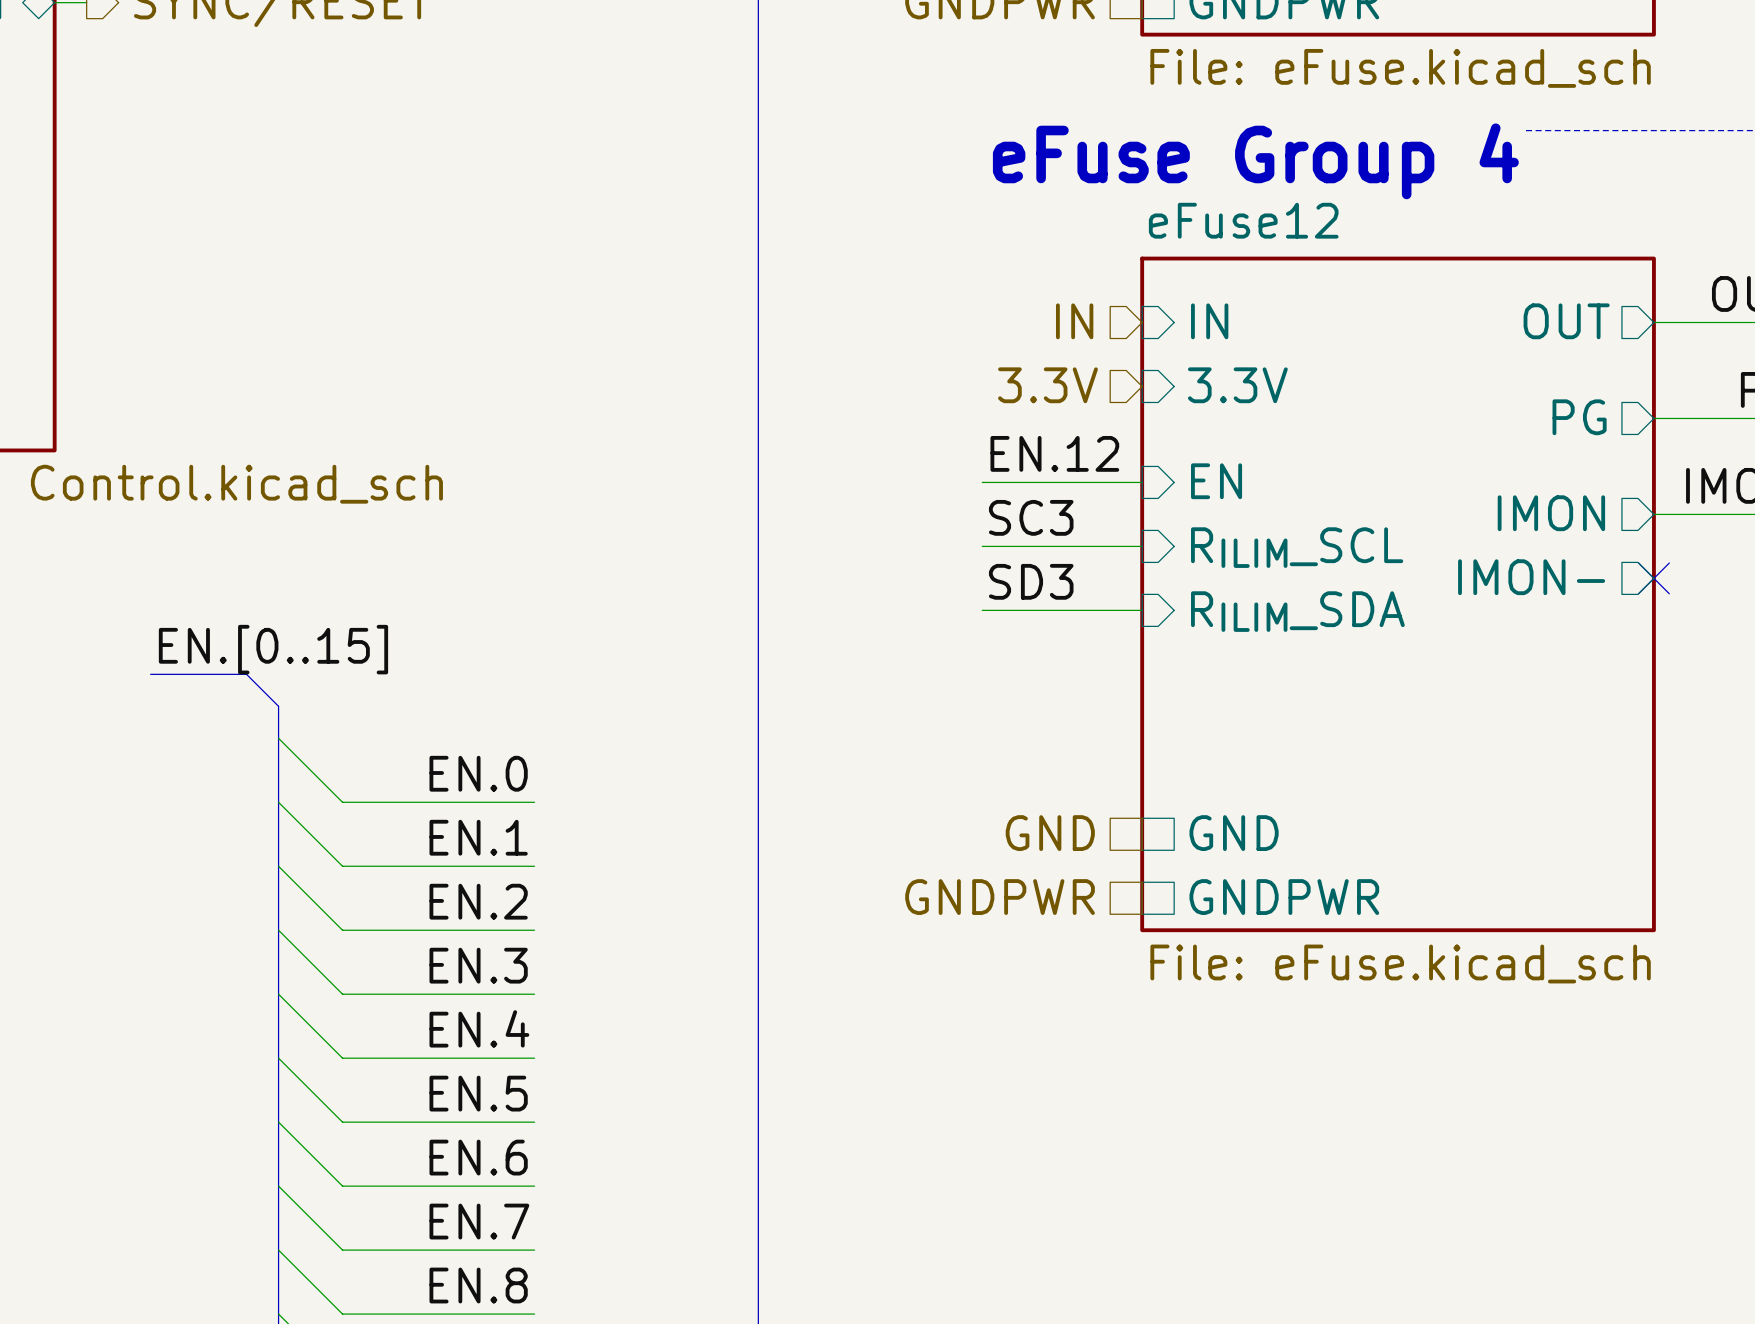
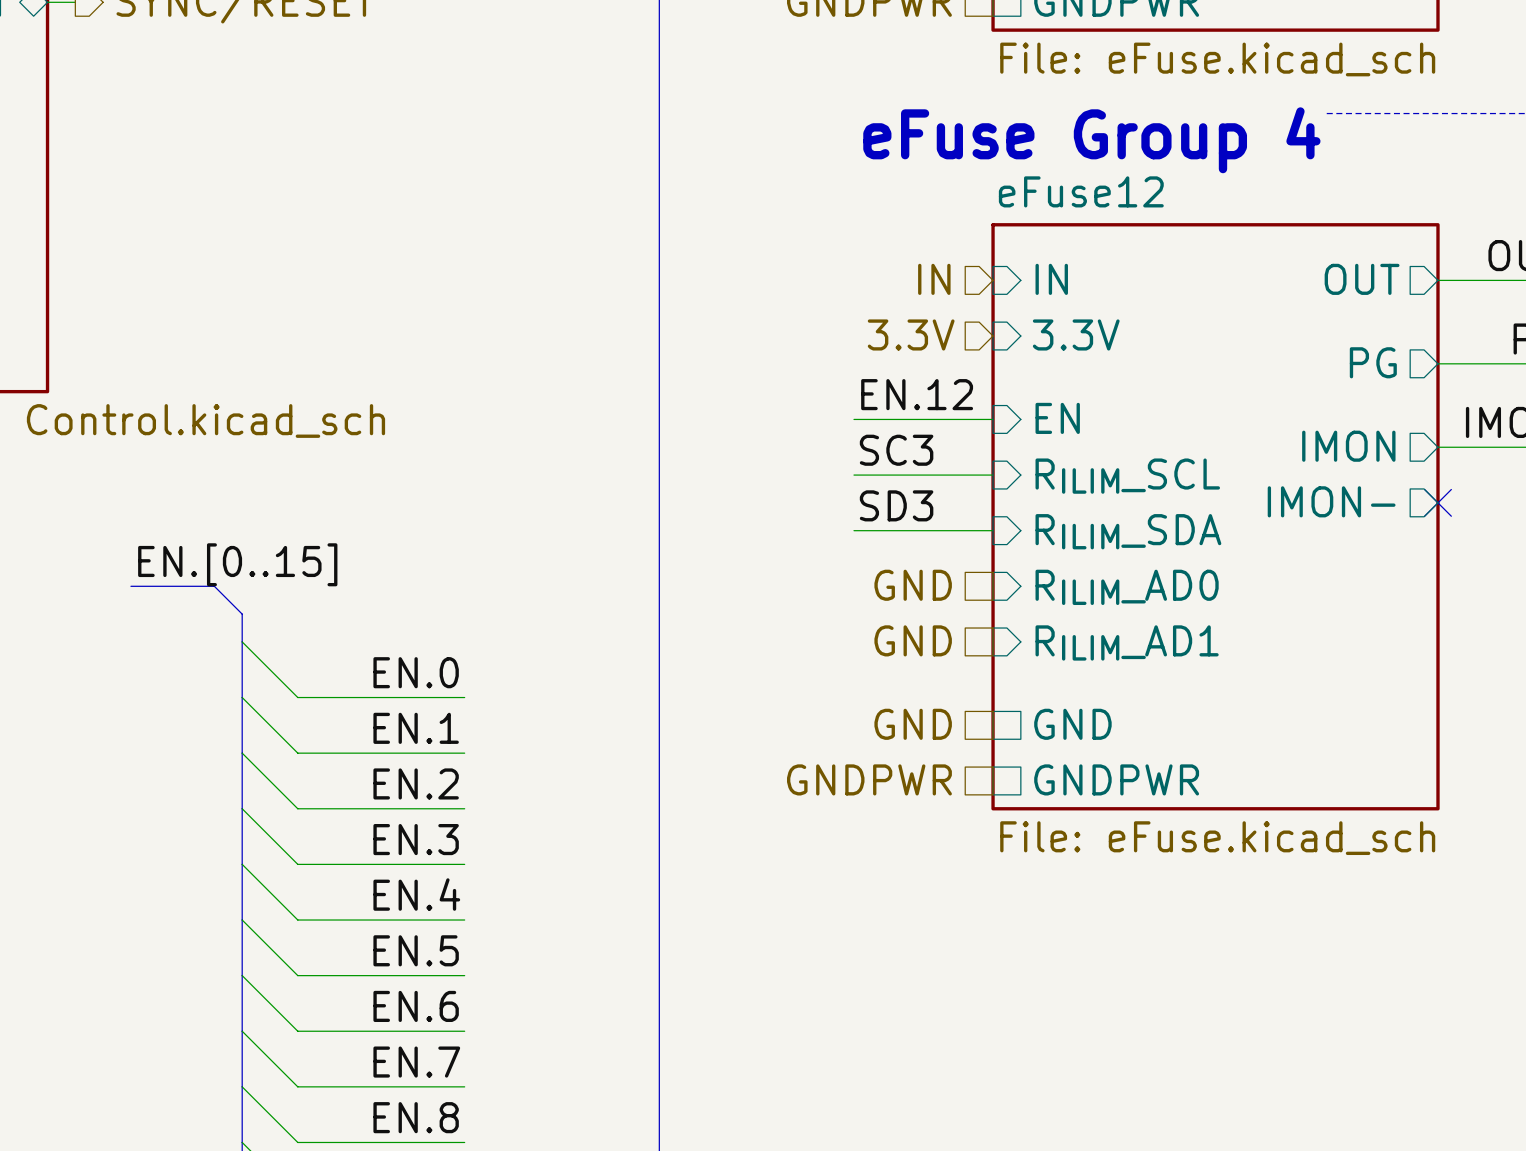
hierarchical label: none -> GND (913, 585)
sheet pin: none -> RILIM_AD0 (1127, 587)
hierarchical label: none -> GND (913, 640)
sheet pin: none -> RILIM_AD1 (1127, 642)

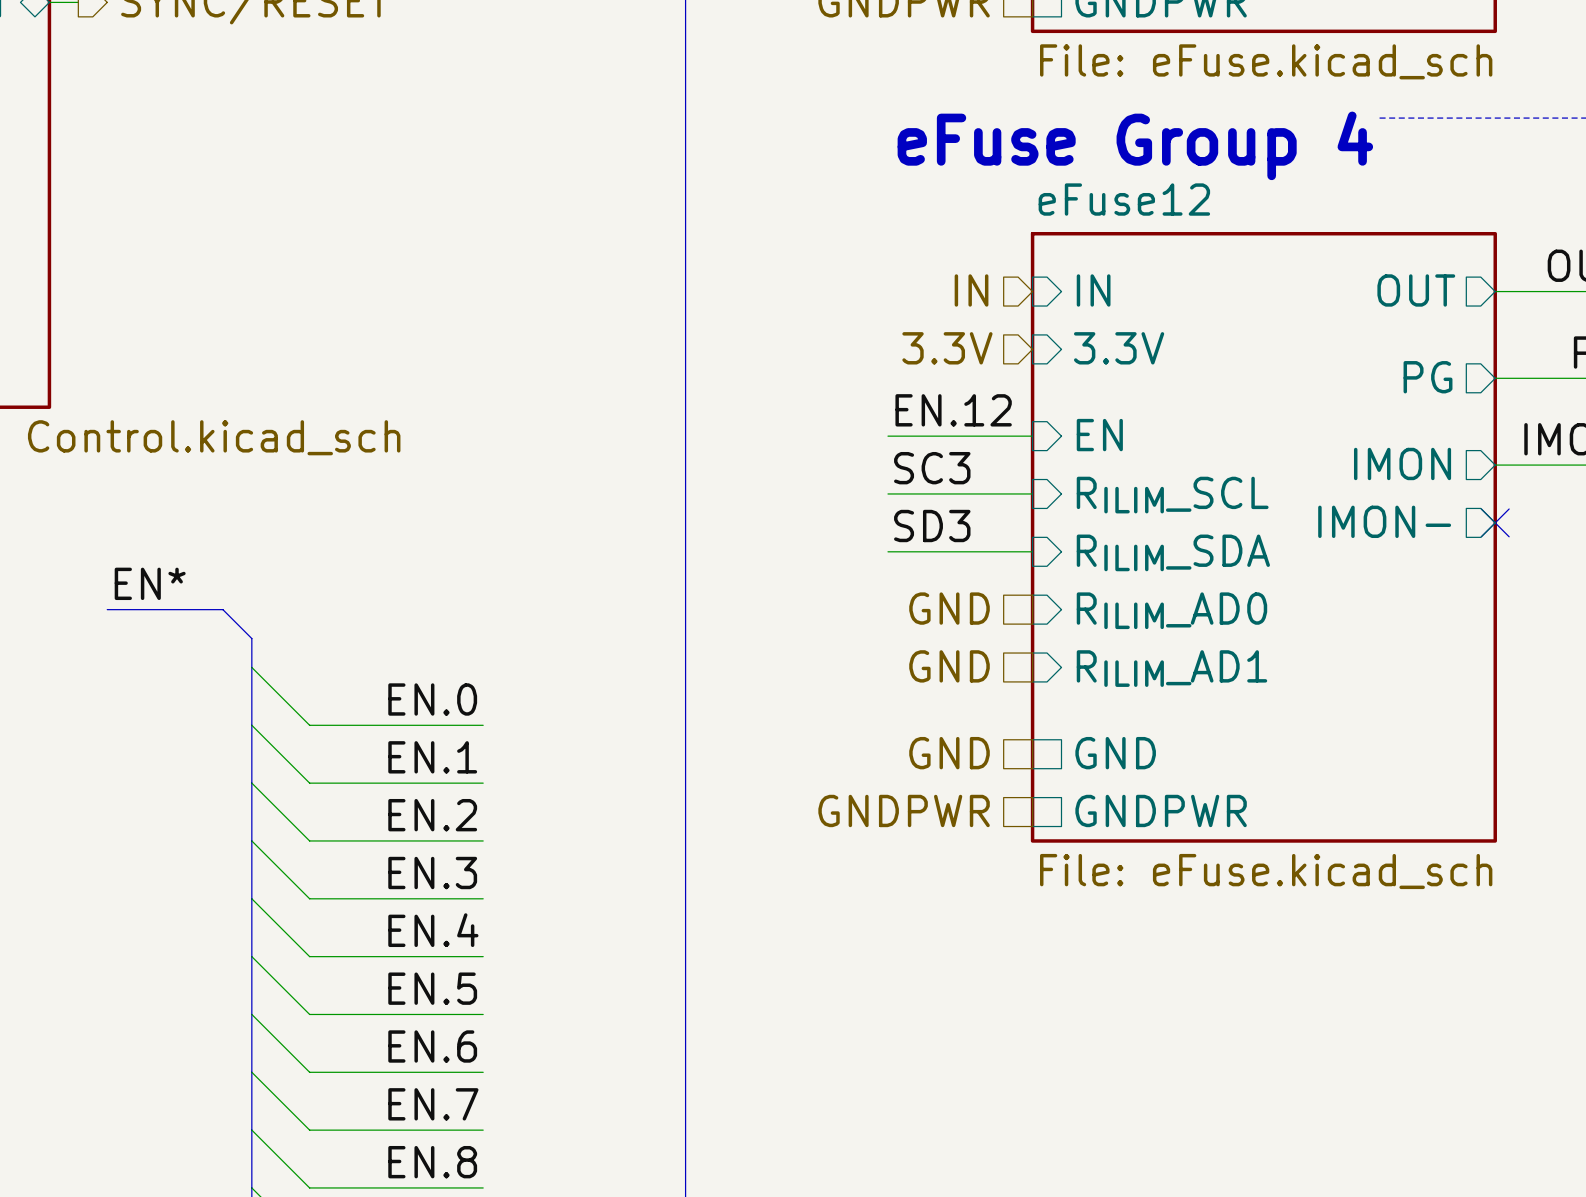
label: none -> EN* (150, 583)
label: EN.[0..15] (237, 564) -> none
bus: none -> (107, 609) (136, 609)

